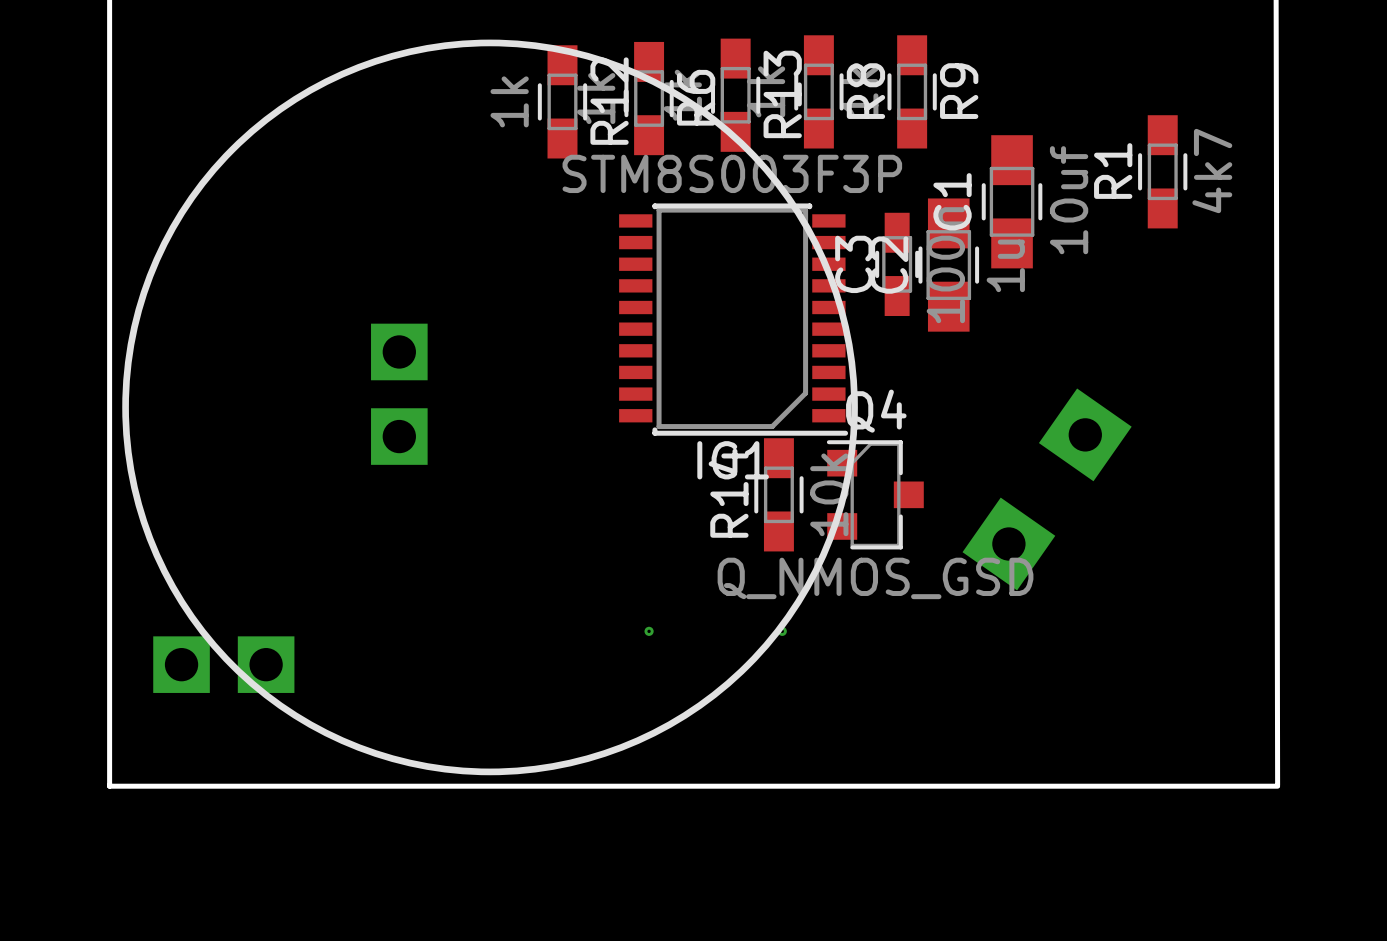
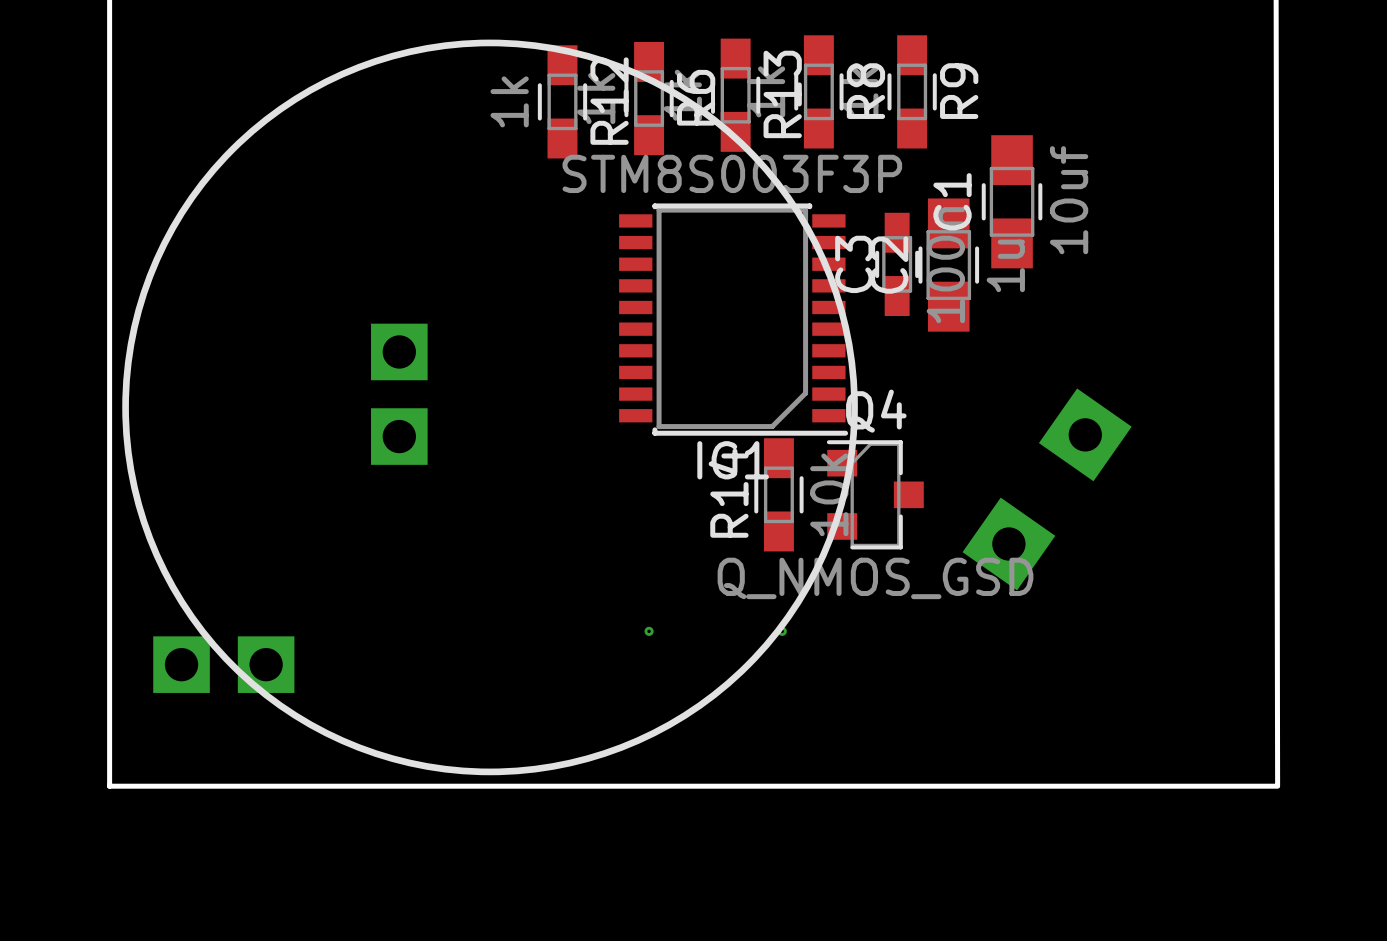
R1: 4k7 (1162, 171) -> none

